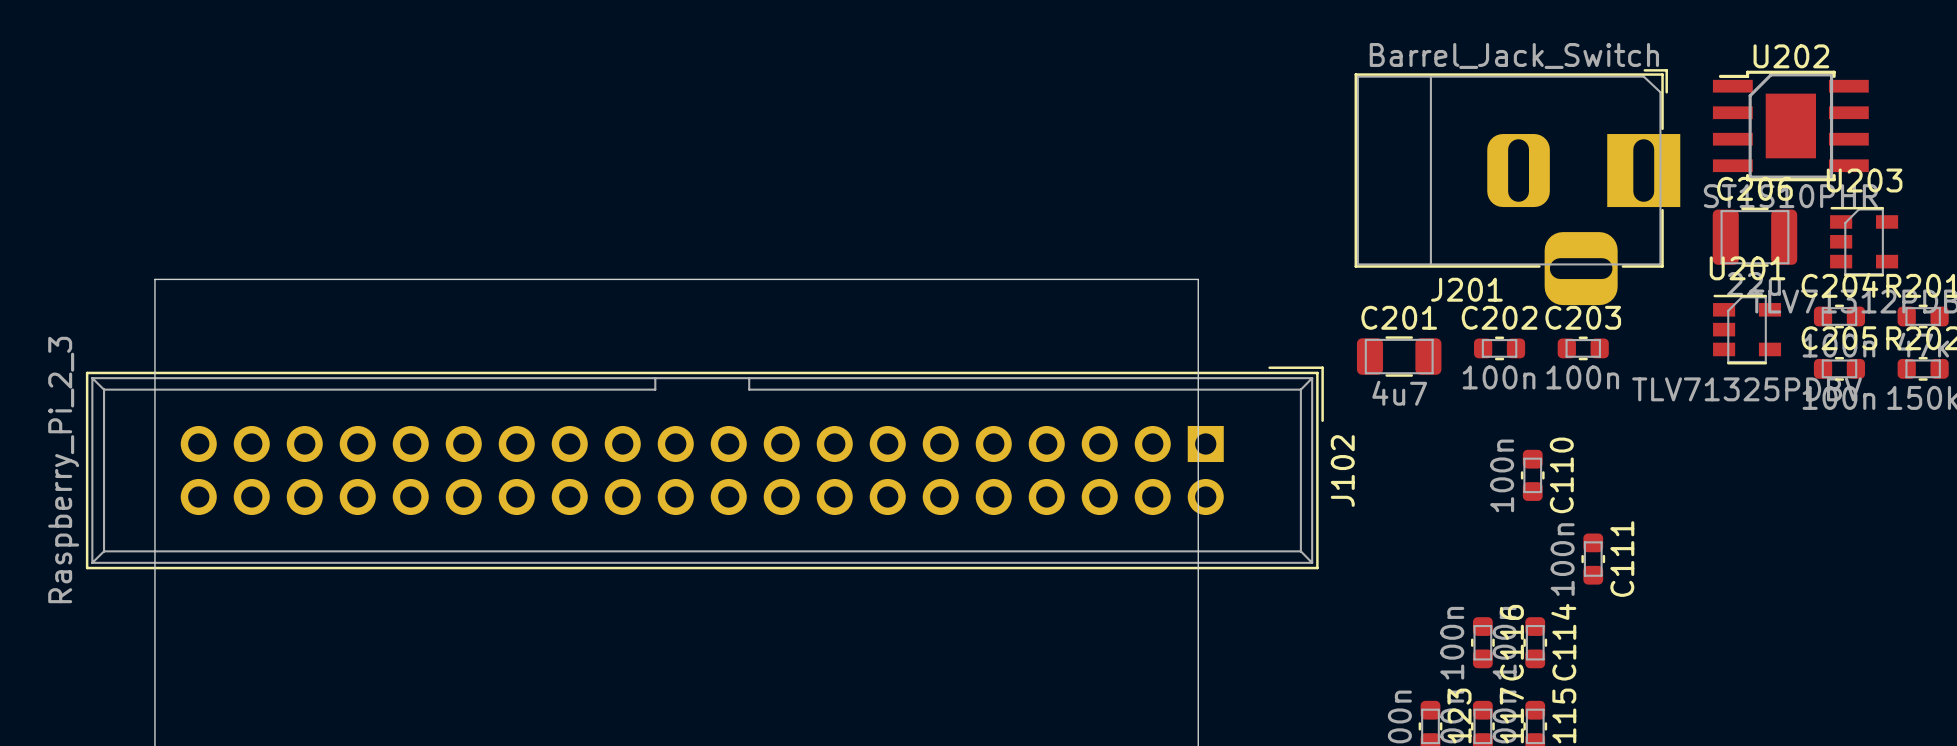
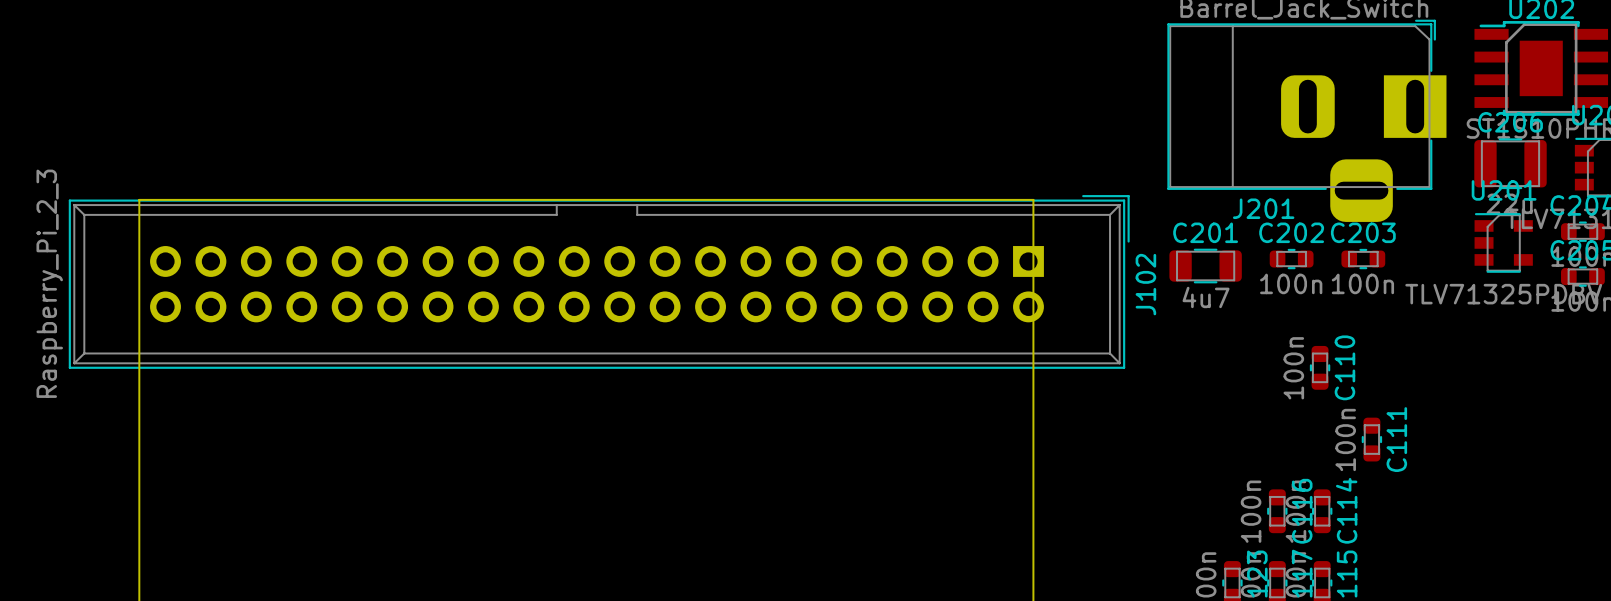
J102 position: (704, 467) -> (599, 281)

